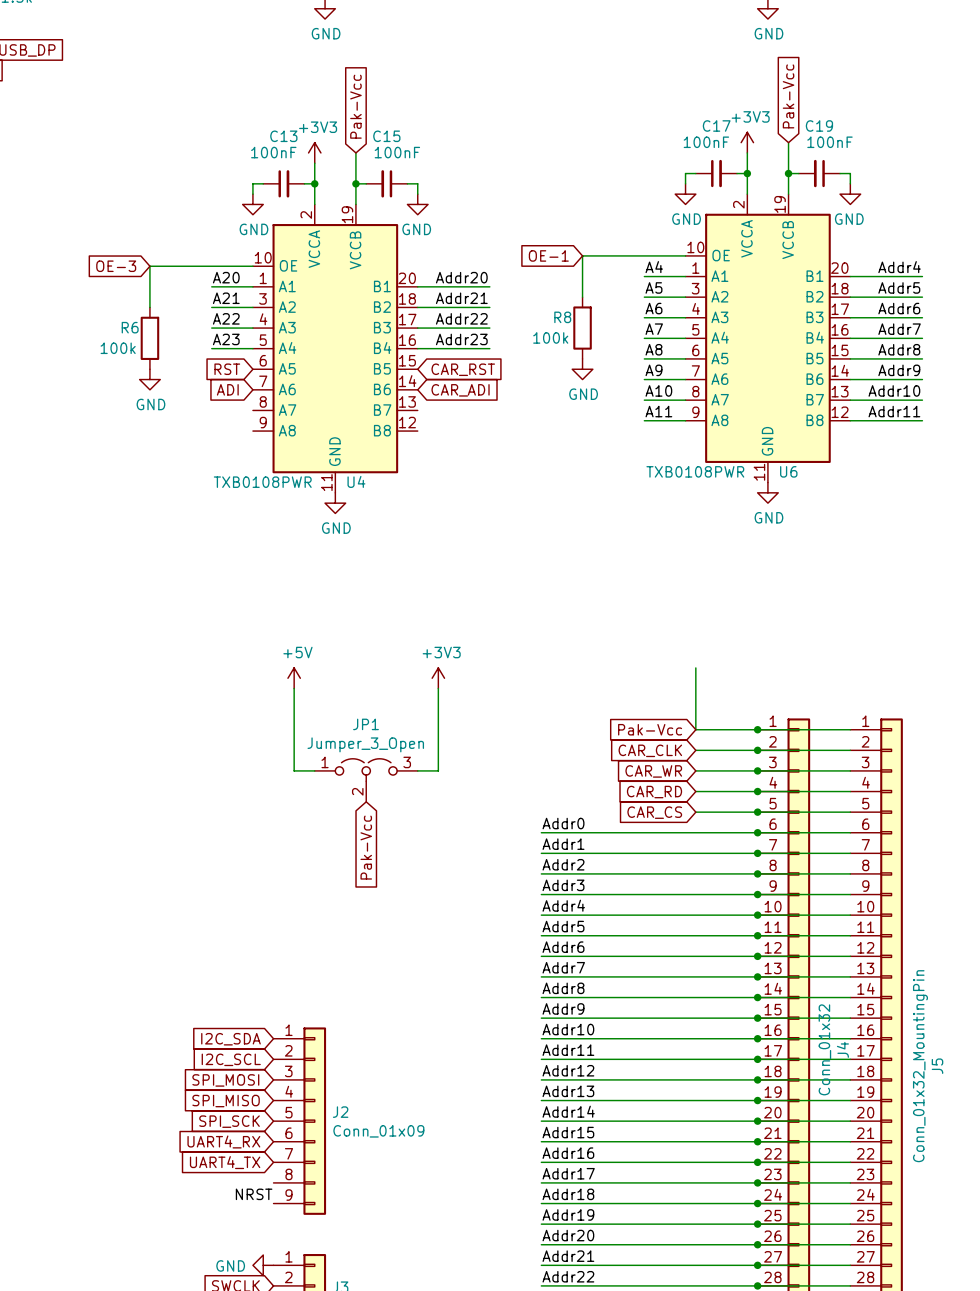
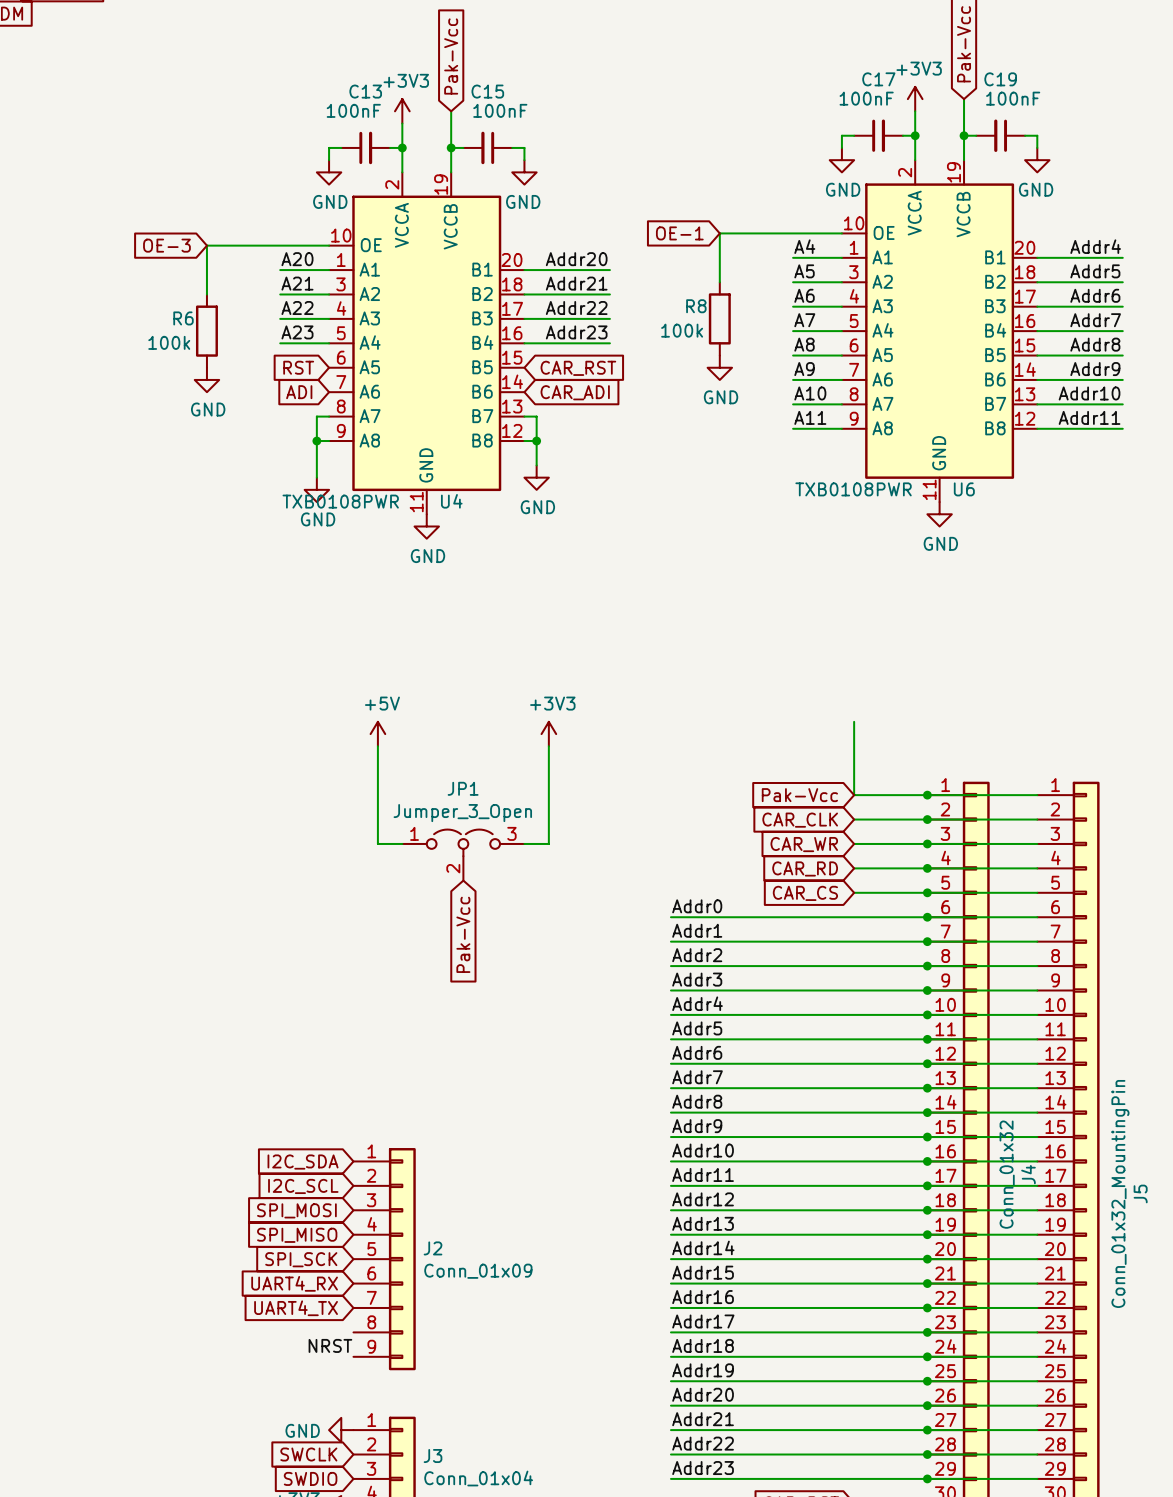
wire: none -> (329, 416) (316, 416) (316, 477)
wire: none -> (524, 416) (536, 416) (536, 465)
wire: none -> (316, 441) (329, 441)
junction: none -> (316, 441)
wire: none -> (524, 441) (536, 441)
junction: none -> (536, 441)
power symbol: none -> GND (536, 477)
power symbol: none -> GND (316, 489)

